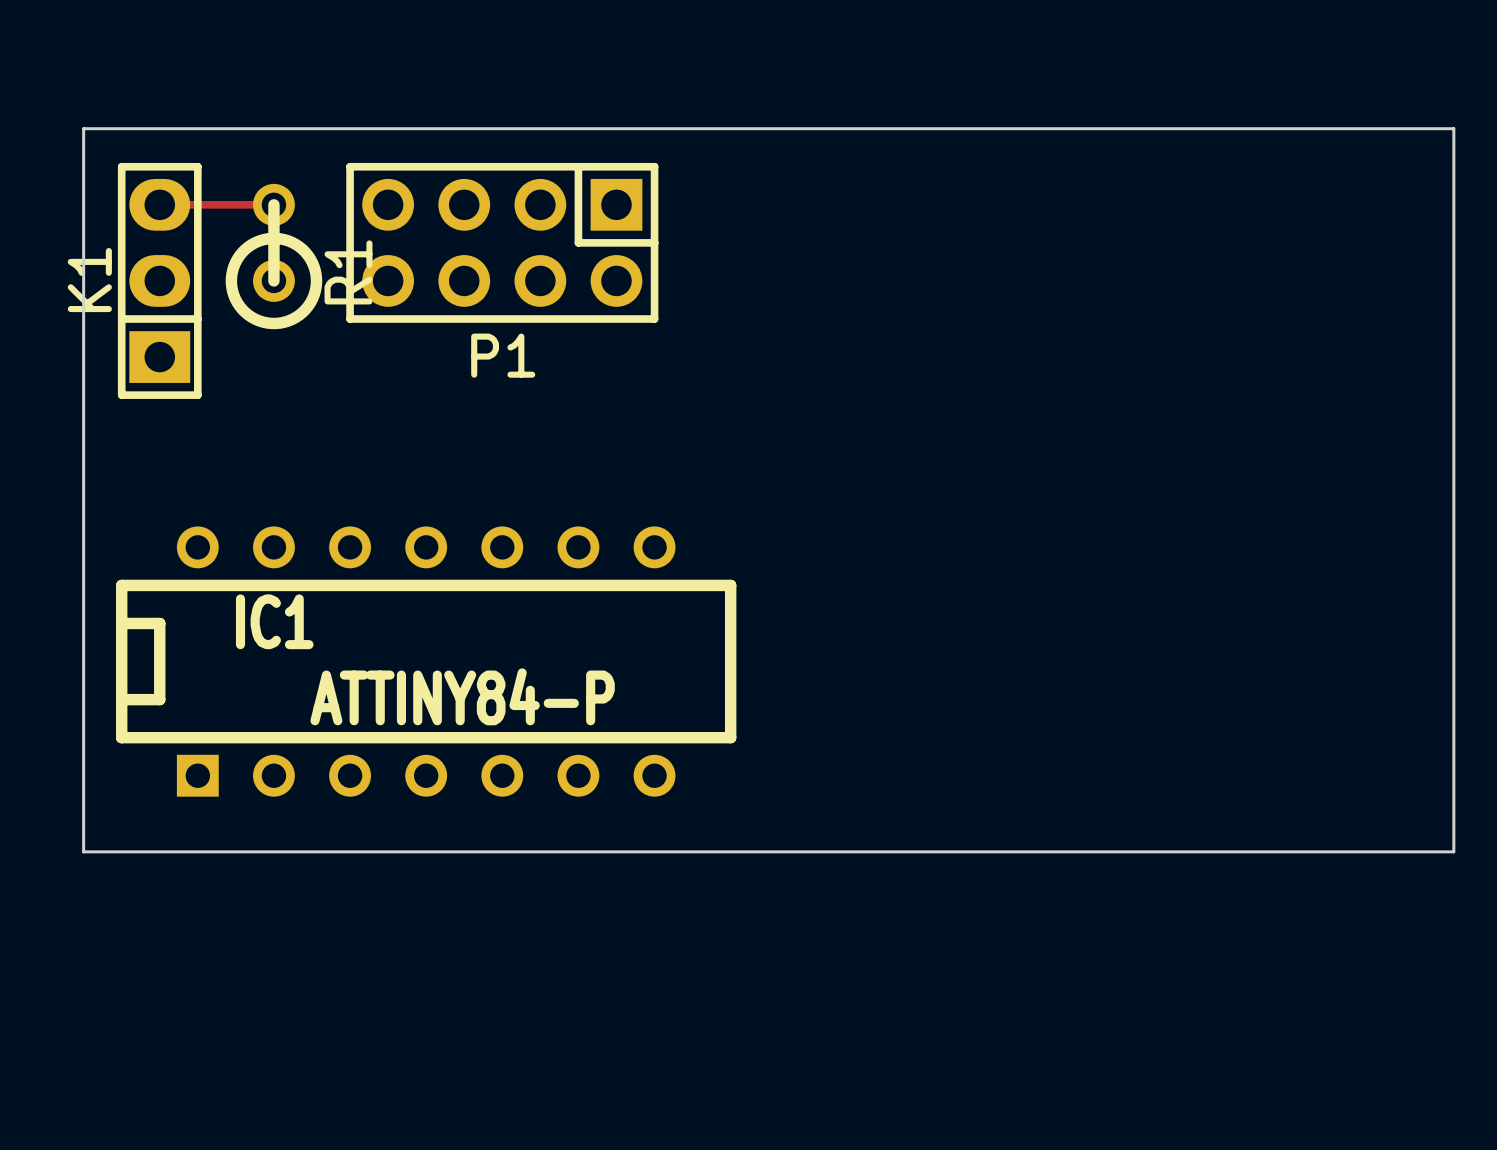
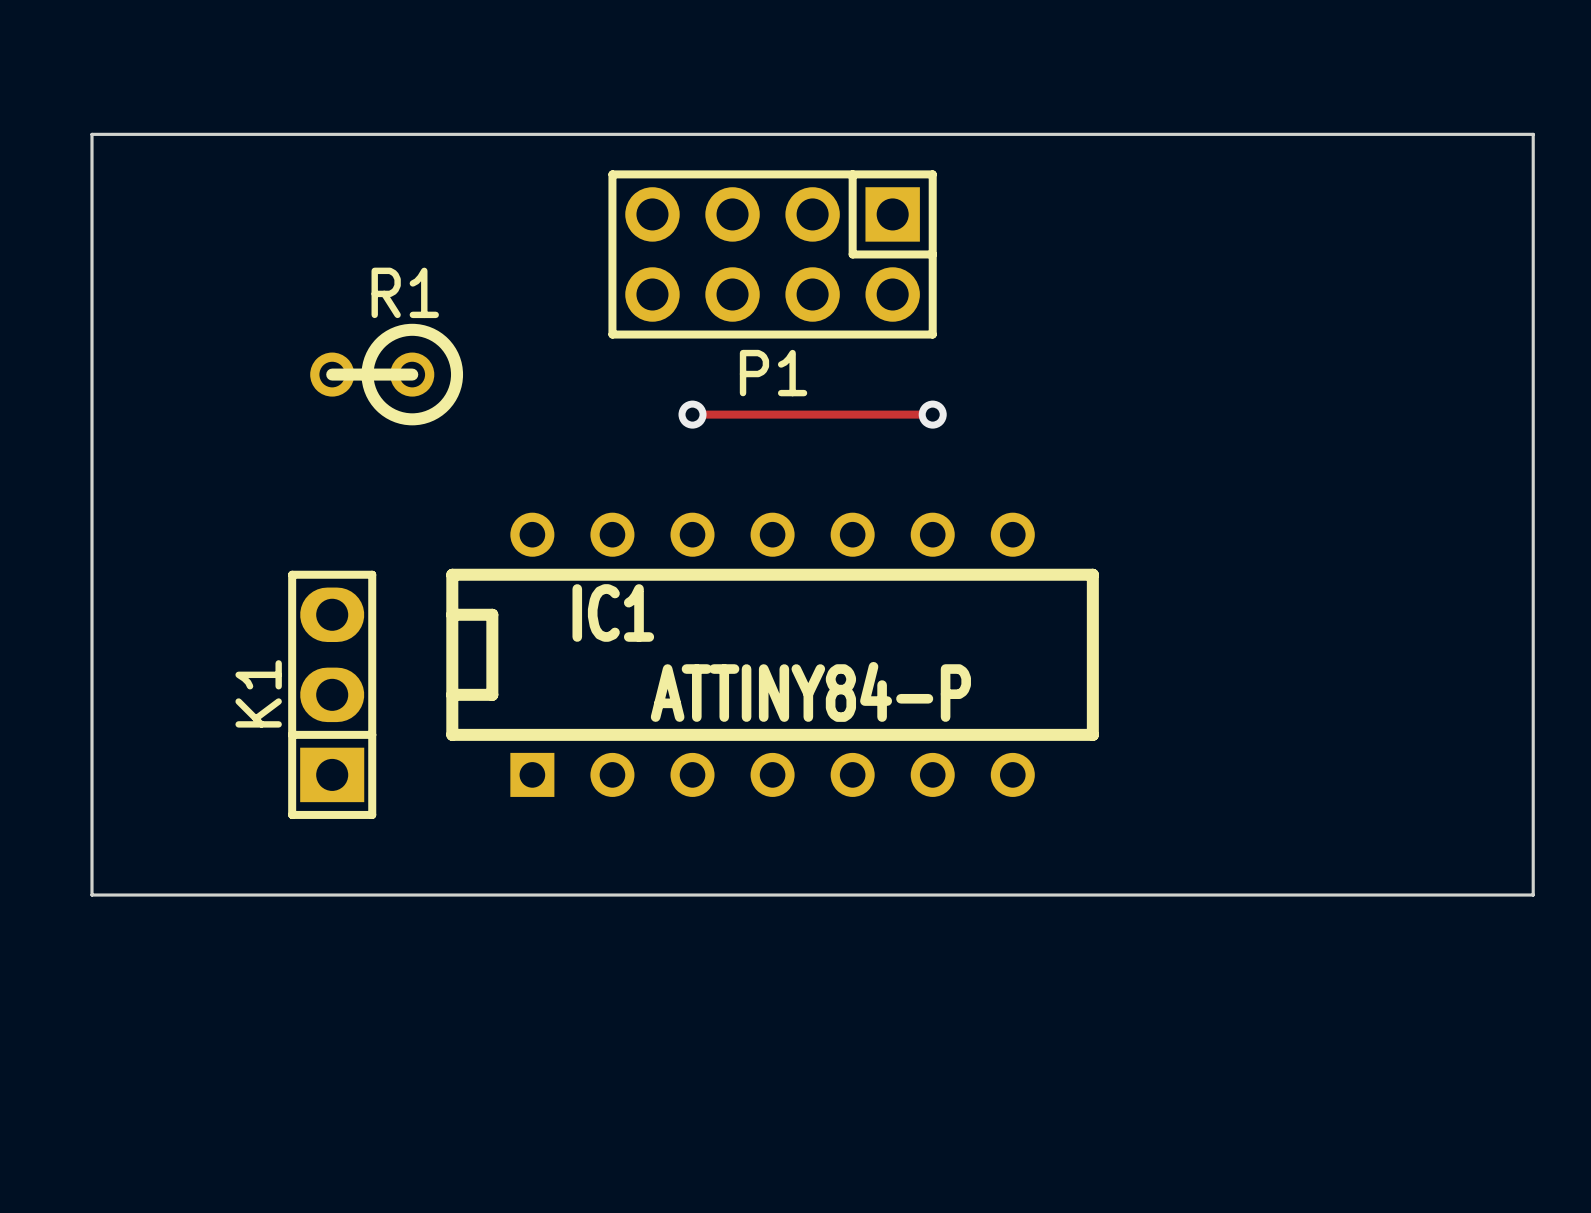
track: (159, 204) (273, 204) -> none
P1 position: (502, 242) -> (772, 254)
R1 rotation: 0° (273, 256) -> 90° counterclockwise (386, 374)
R1 position: (273, 256) -> (386, 374)
K1 position: (159, 280) -> (332, 694)
track: none -> (692, 414) (932, 414)
via: none -> (692, 414)
via: none -> (932, 414)
IC1 position: (426, 661) -> (772, 654)

